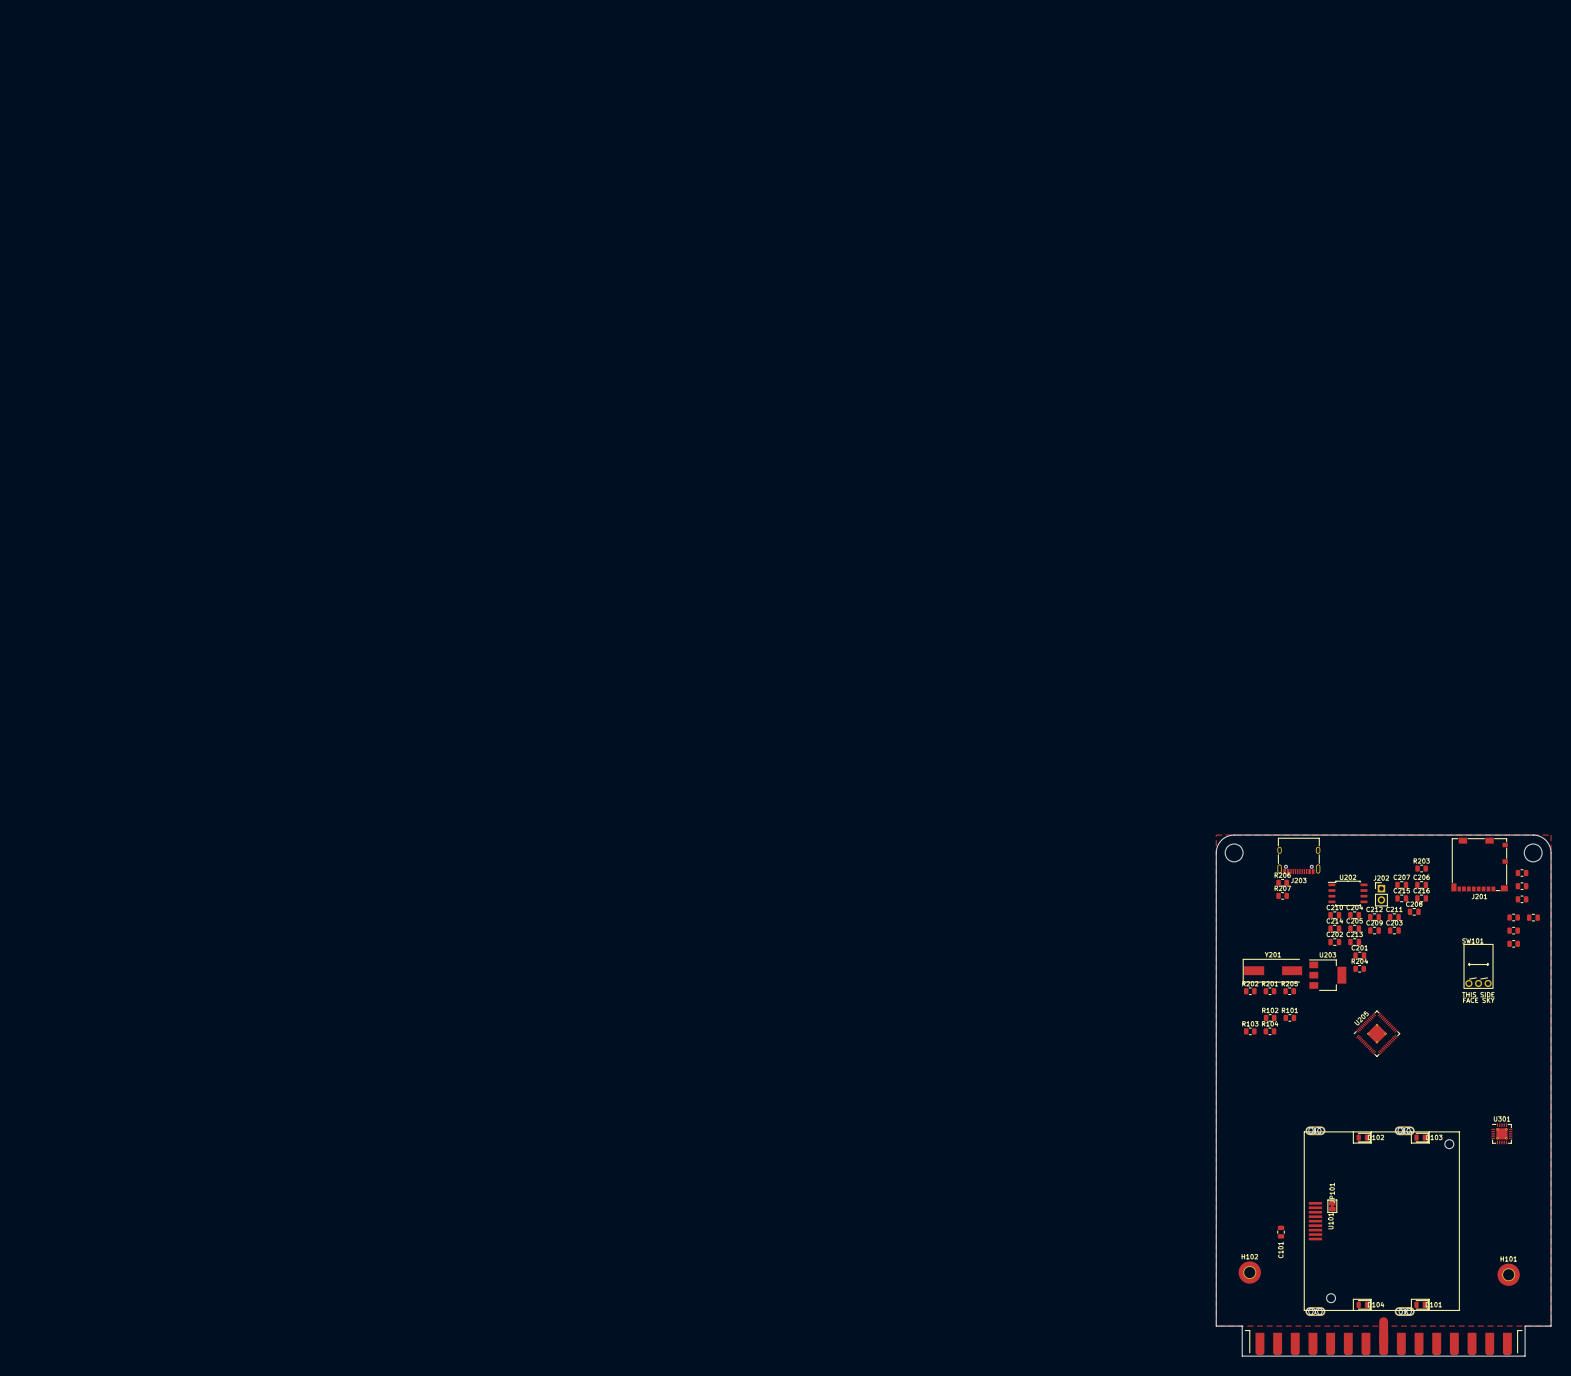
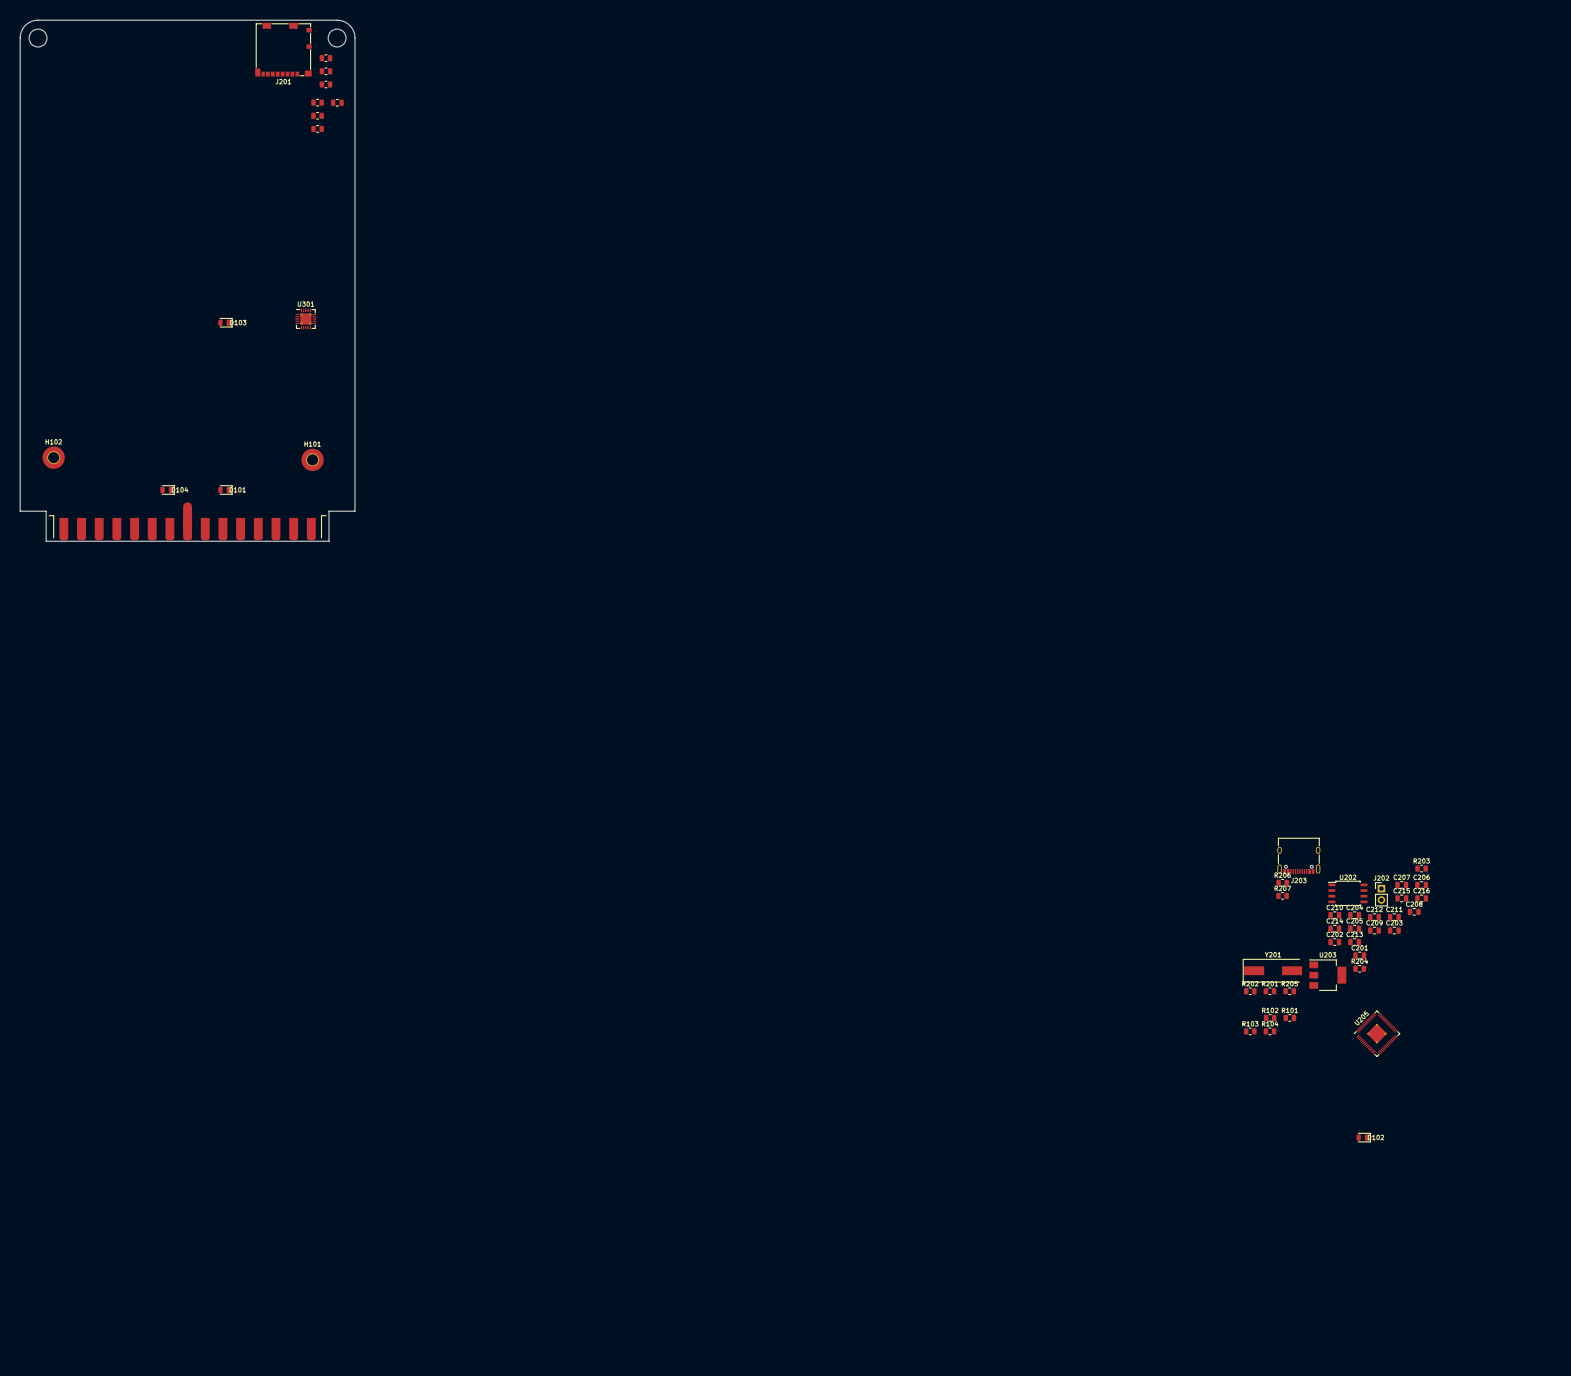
part: none -> (325, 58)
part: none -> (325, 71)
part: none -> (325, 84)
part: none -> (317, 102)
part: none -> (337, 102)
part: none -> (317, 115)
part: none -> (317, 128)
part: none -> (187, 280)
track: none -> (187, 506) (187, 529)
zone outline: (1216, 835) (1216, 1326) (1551, 1326) (1551, 835) (1216, 835) -> none
part position: (1479, 864) -> (283, 49)
part: (1522, 873) -> none
part: (1522, 886) -> none
part: (1522, 899) -> none
part: (1513, 917) -> none
part: (1533, 917) -> none
part: (1513, 930) -> none
part: (1513, 943) -> none
part: (1478, 966) -> none
part: (1383, 1095) -> none
part position: (1501, 1133) -> (305, 318)
part position: (1421, 1137) -> (225, 322)
part: (1332, 1206) -> none
part: (1381, 1221) -> none
part: (1280, 1232) -> none
part position: (1249, 1272) -> (53, 457)
part position: (1508, 1274) -> (312, 459)
part position: (1363, 1304) -> (167, 489)
part position: (1421, 1304) -> (225, 489)
track: (1383, 1321) (1383, 1343) -> none

